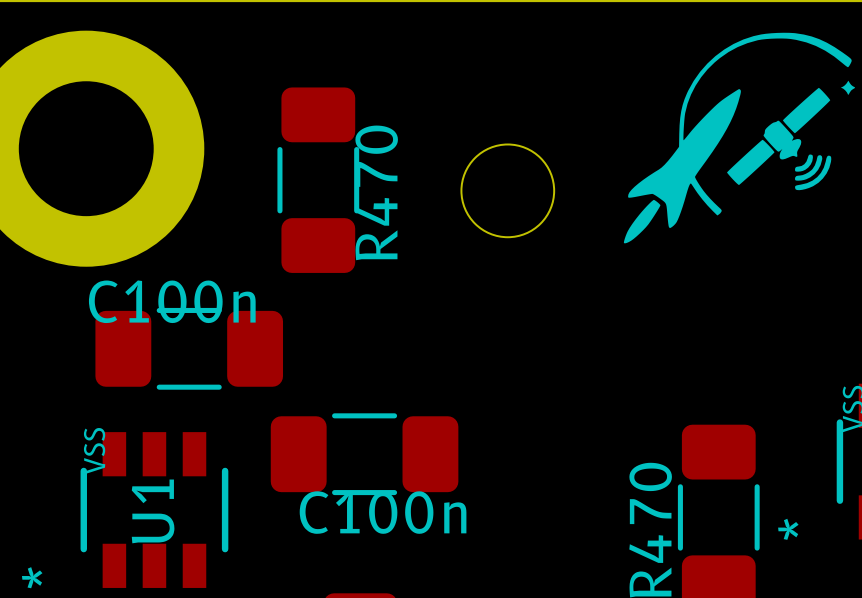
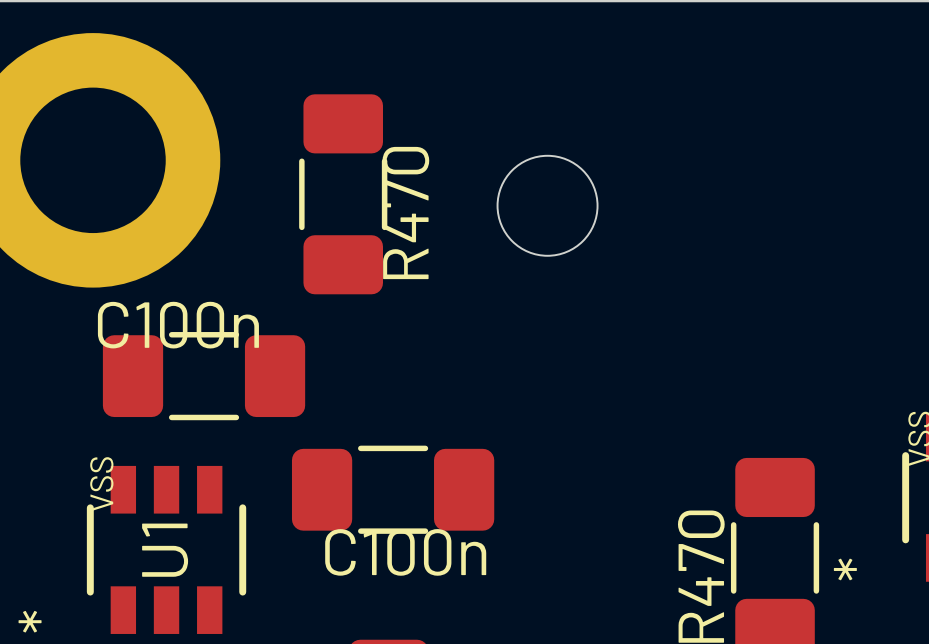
drawing: [623, 32, 856, 244] -> none

